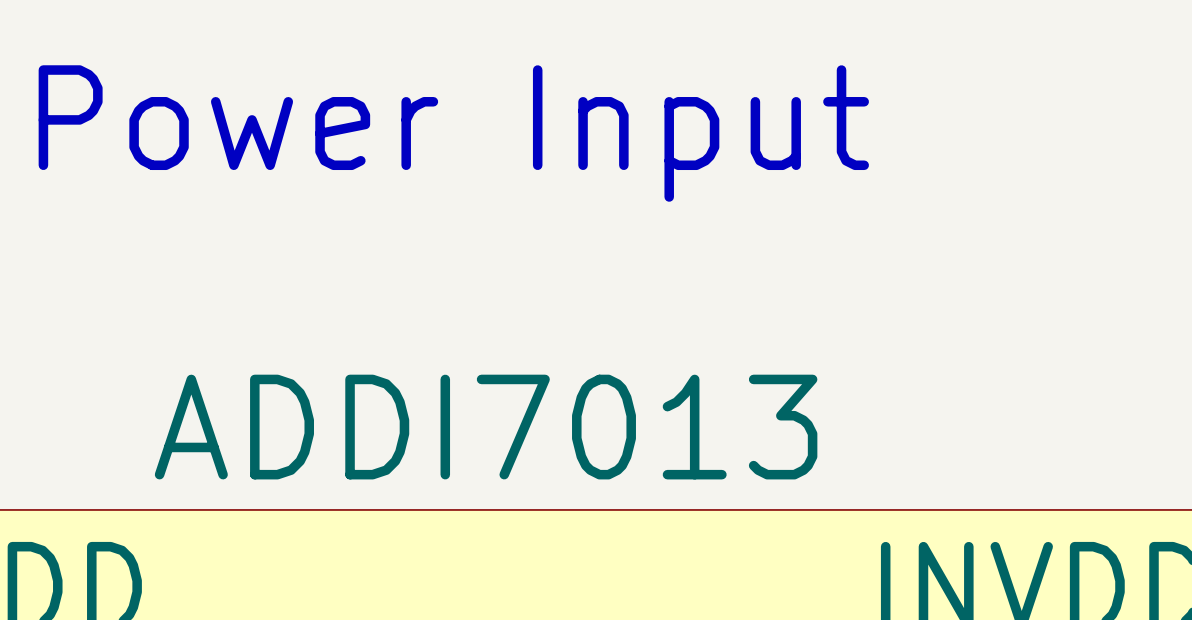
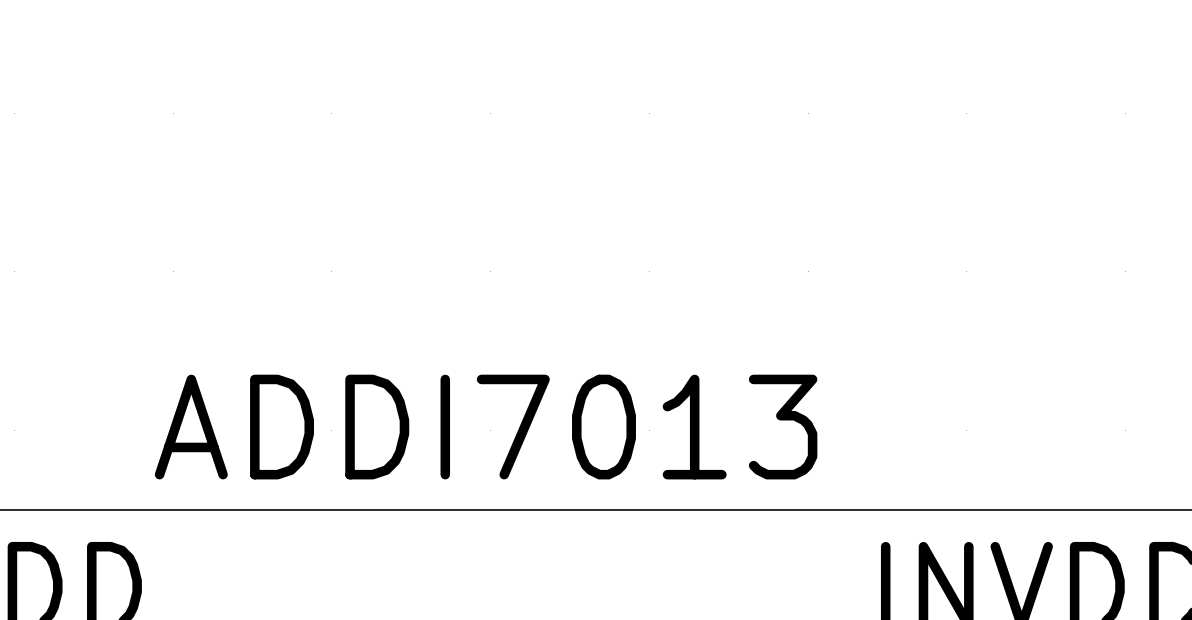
text: Power Input (453, 133) -> none

